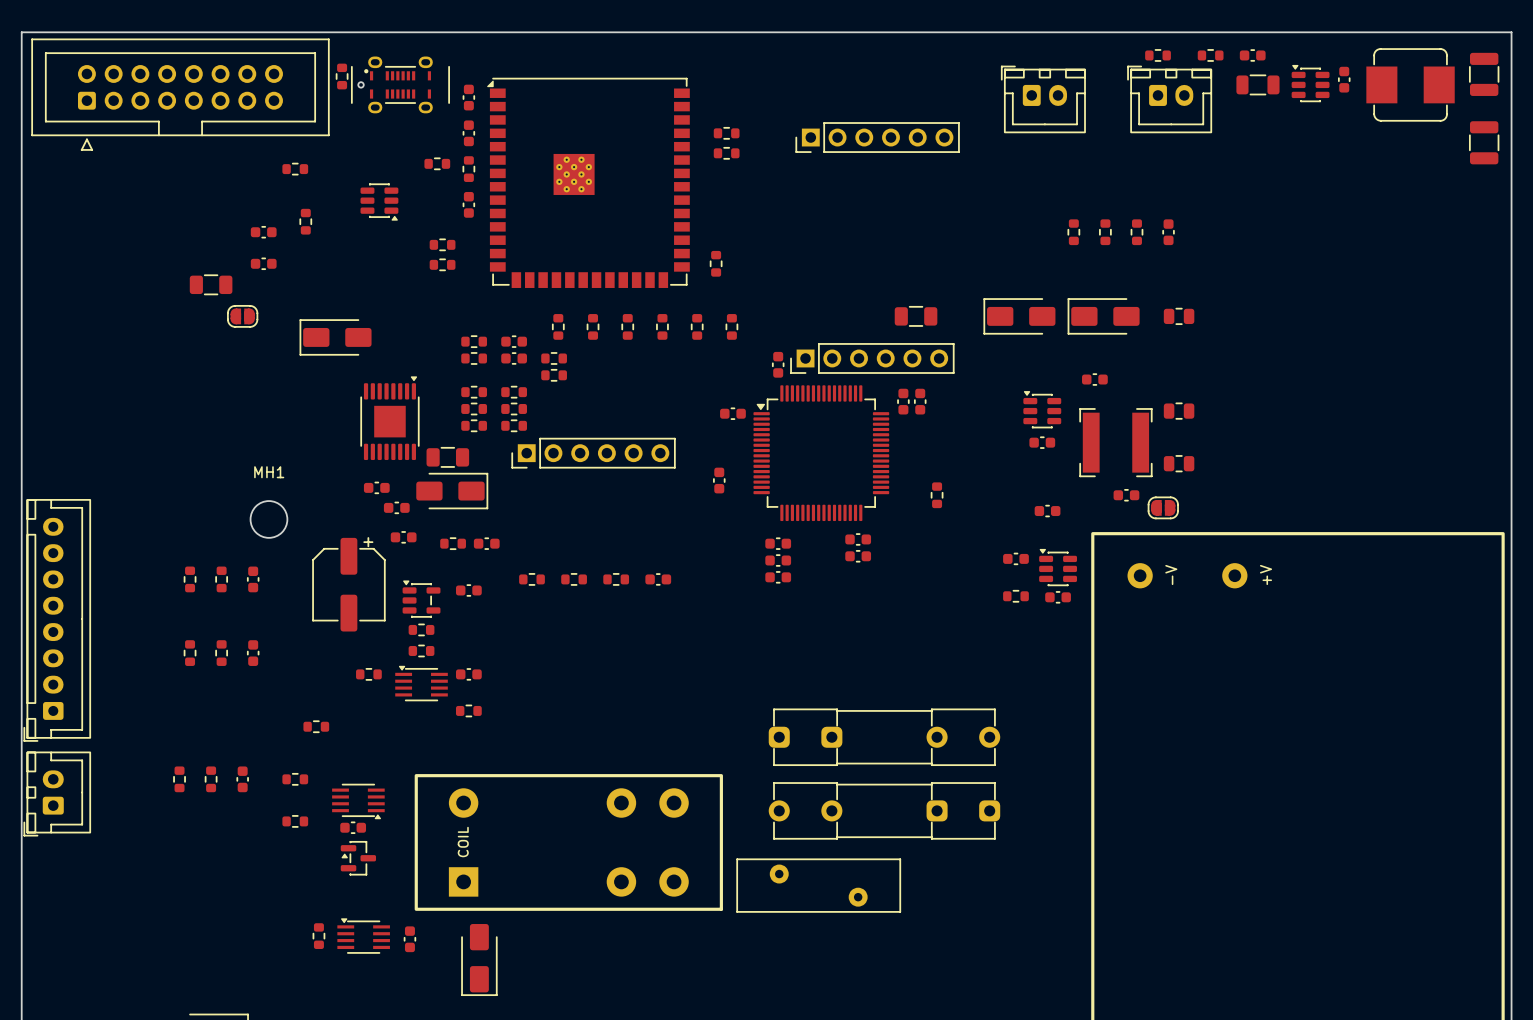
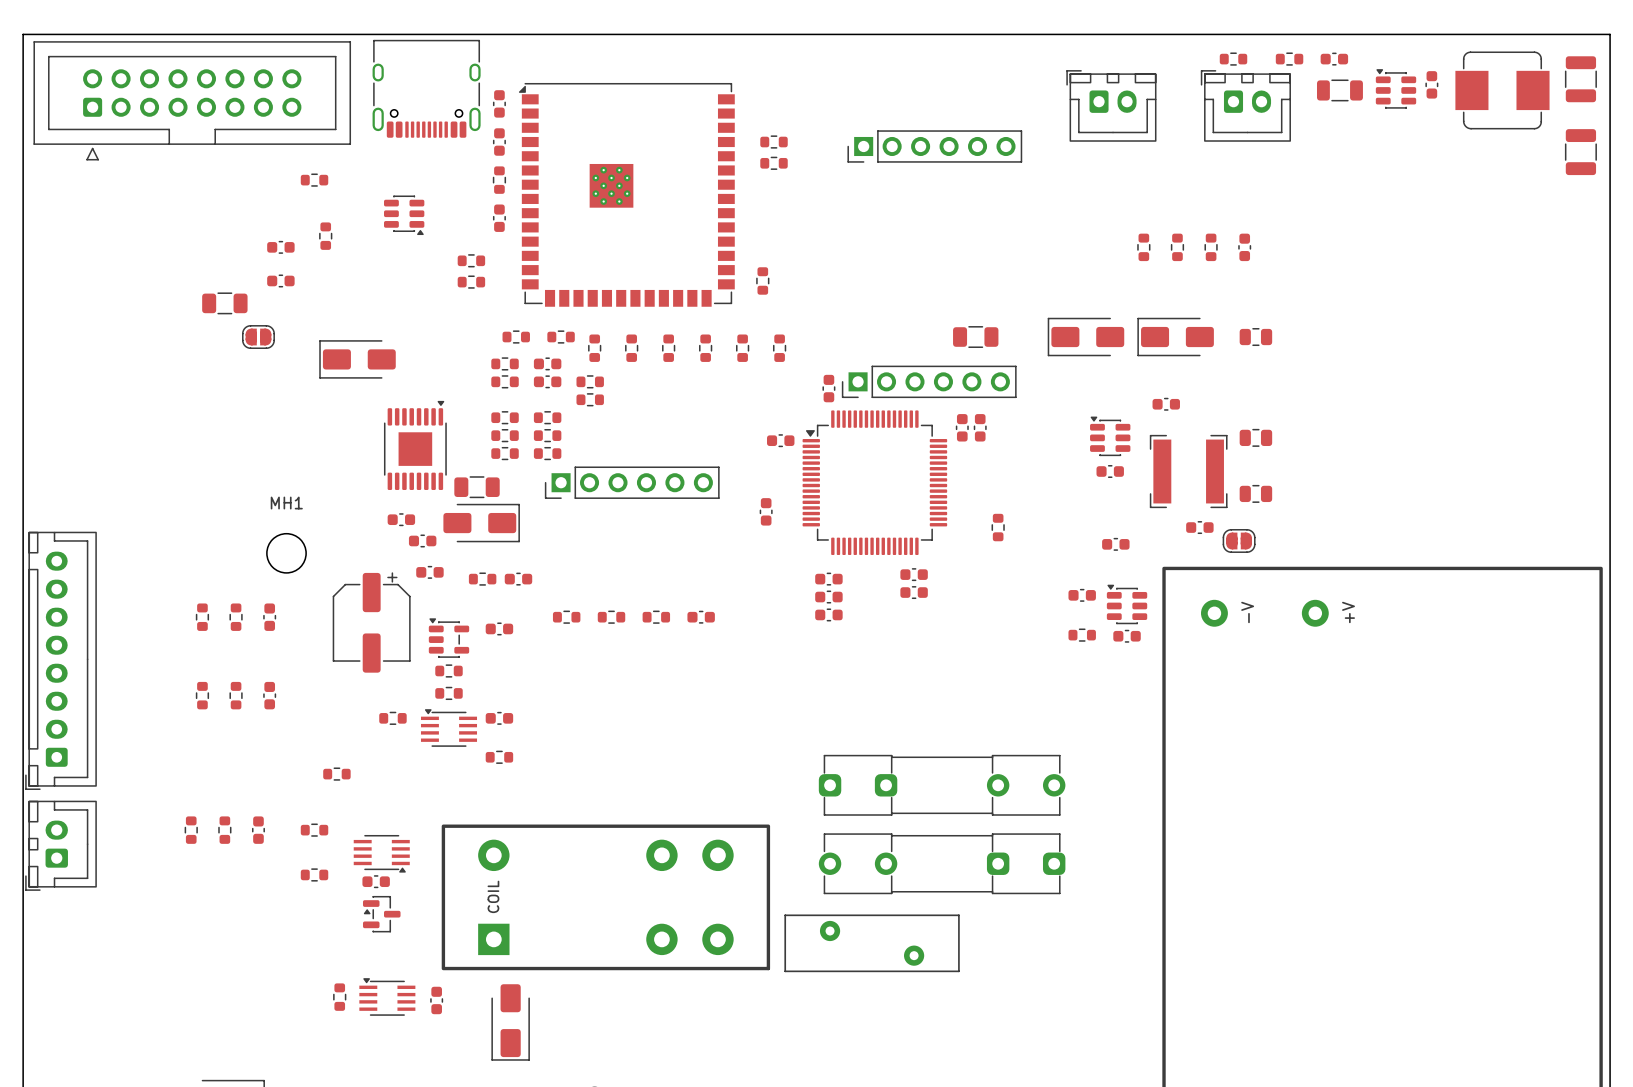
part footprint: [351, 56, 450, 114] -> [372, 39, 481, 138]
part: (342, 76) -> none
part: (437, 163) -> none
part: none -> (516, 337)
part: none -> (561, 337)

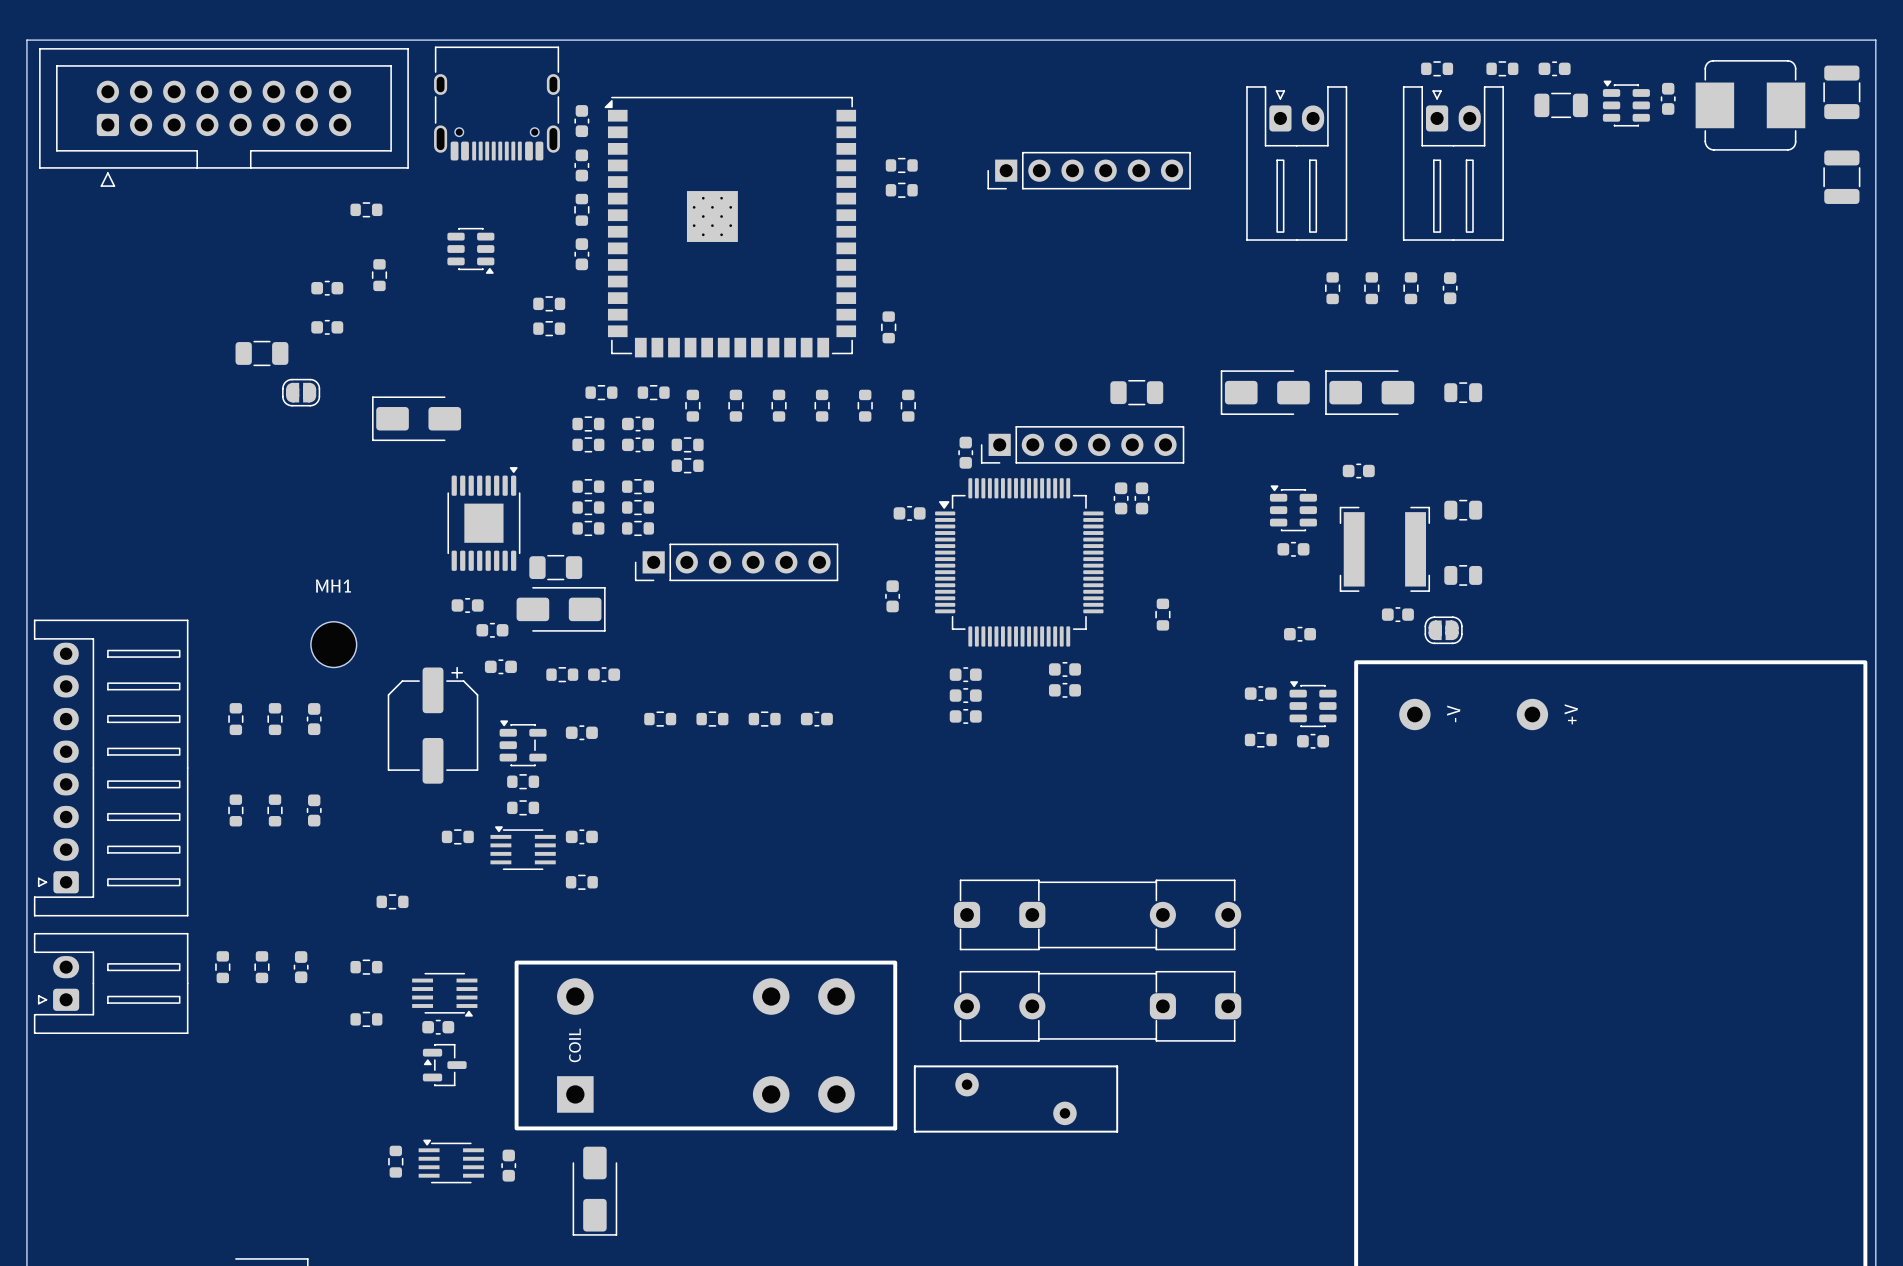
part: (1111, 105) -> none
part: (1245, 105) -> none
part: none -> (1296, 163)
part: none -> (1453, 163)
part: none -> (111, 768)
part: (61, 660) -> none
part: none -> (111, 983)
part: (61, 845) -> none

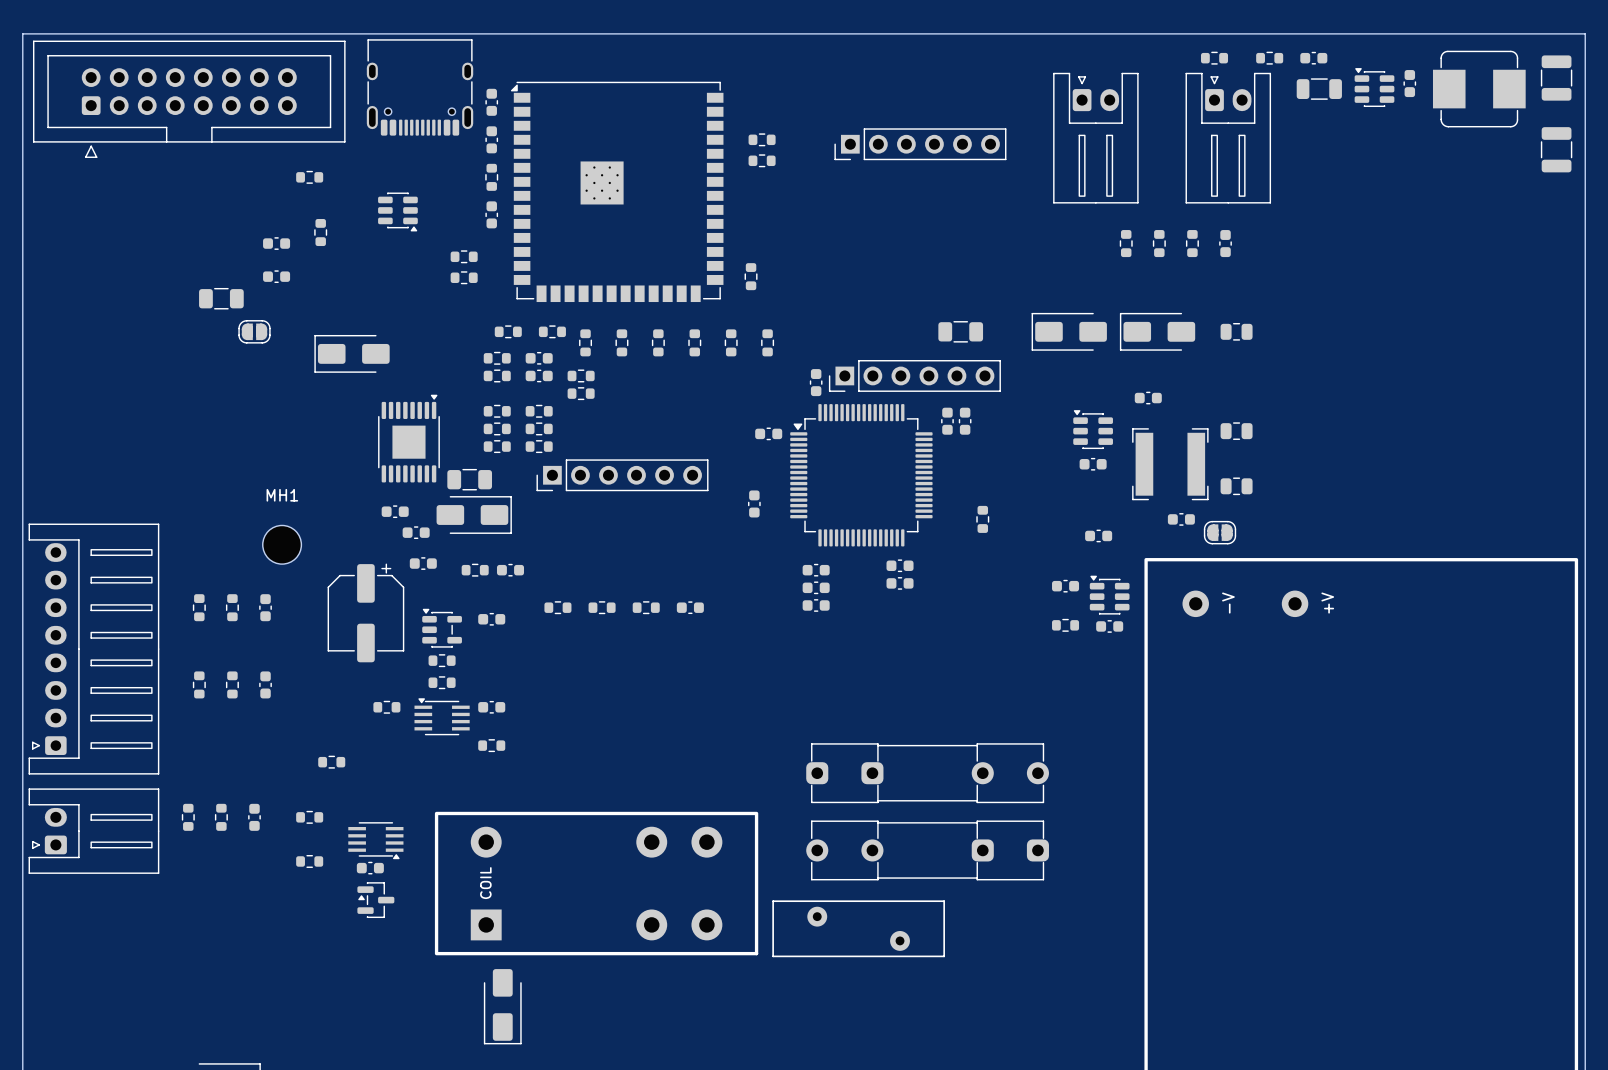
part: (395, 1161) -> none
part: (451, 1161) -> none
part: (508, 1165) -> none

